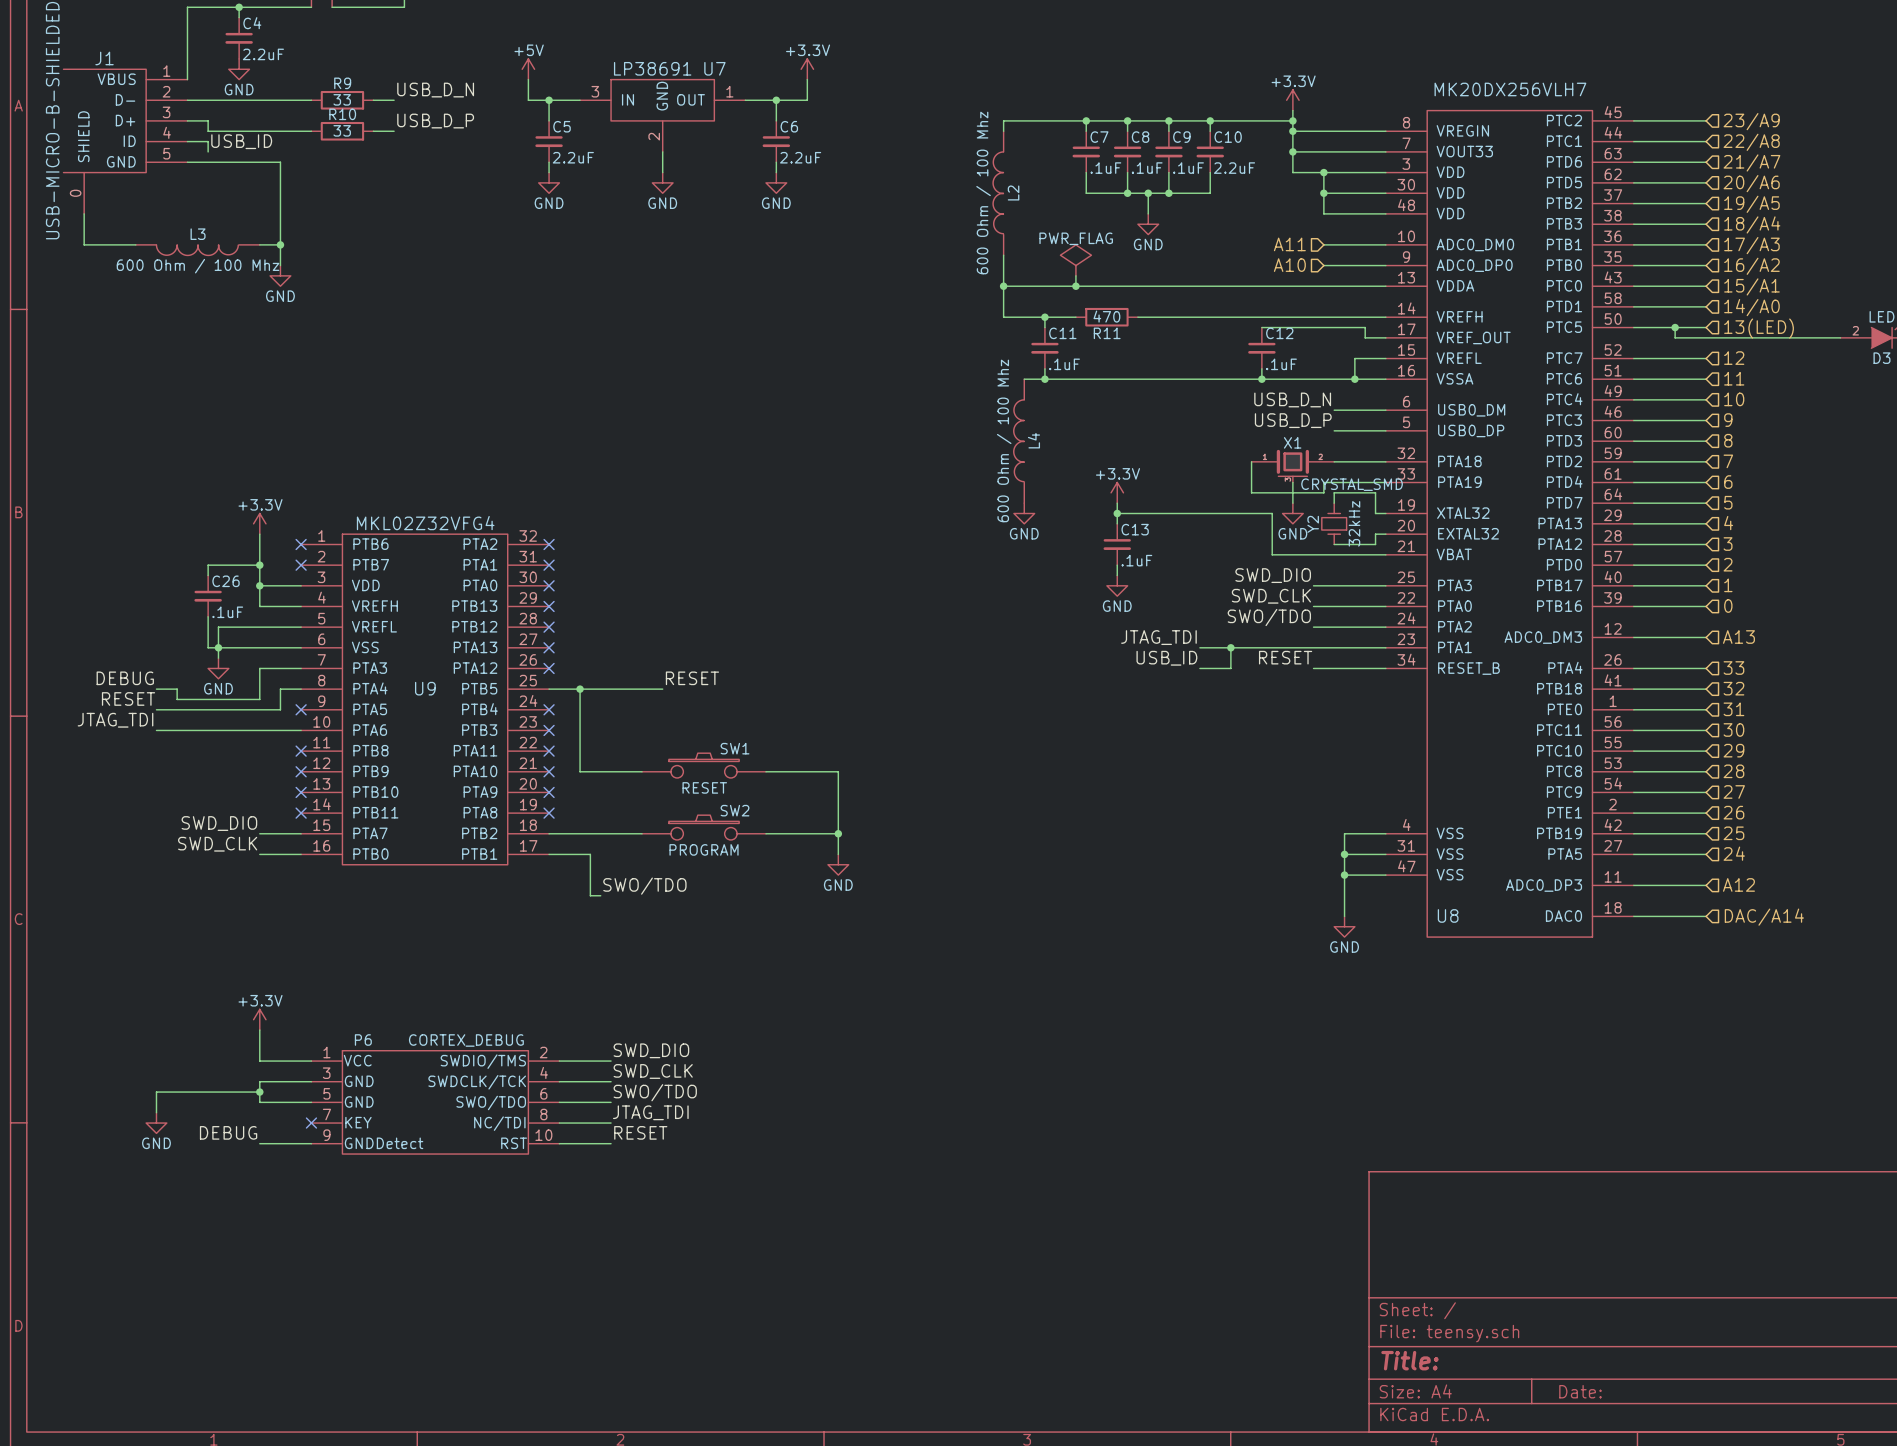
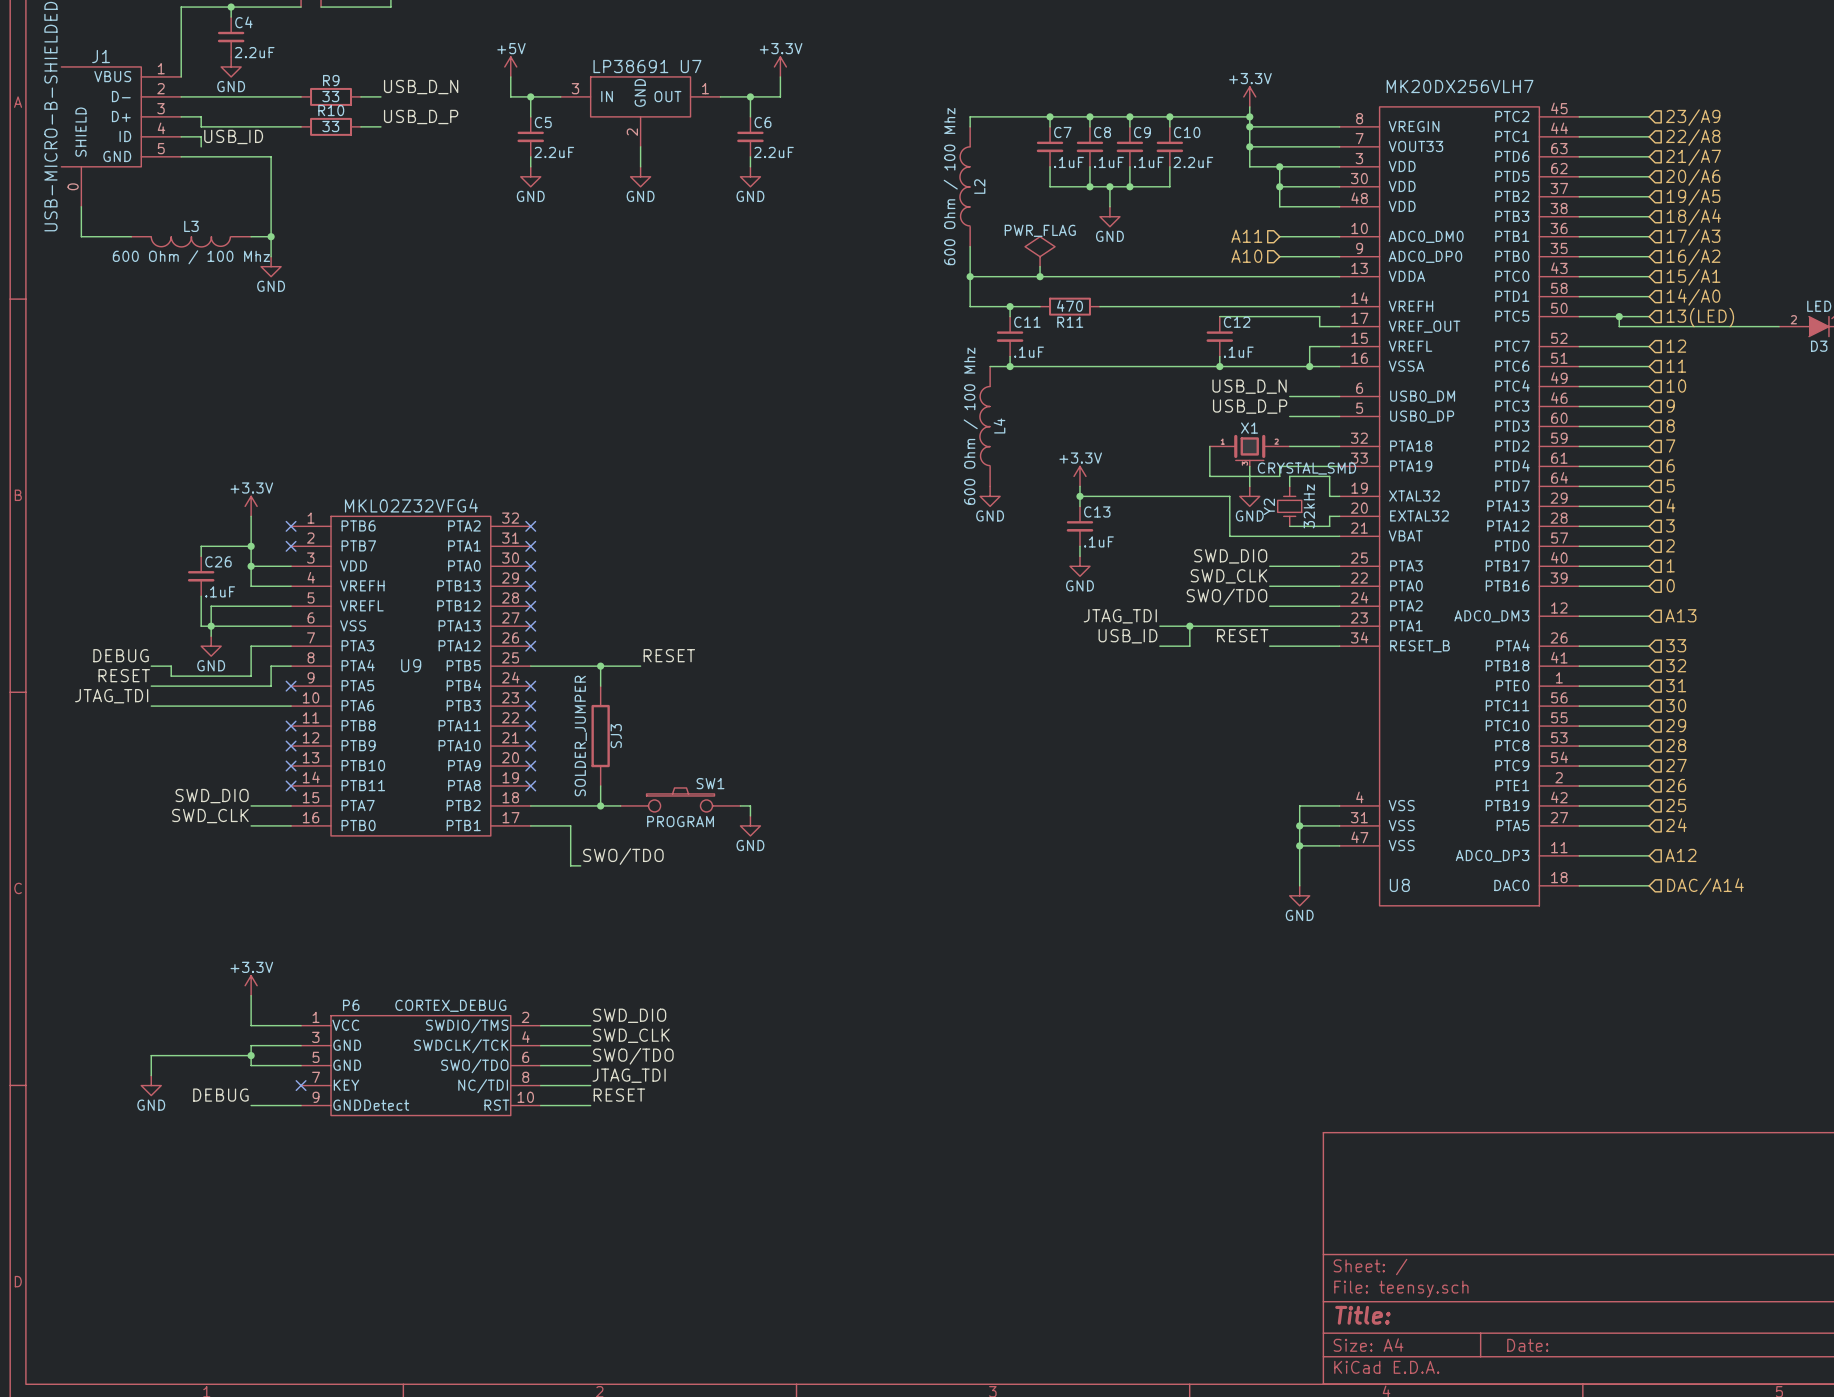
wire: (580, 689) (580, 771) (642, 771) -> none
junction position: (580, 689) -> (600, 666)
wire: none -> (600, 666) (600, 686)
SJ3: none -> SOLDER_JUMPER (600, 736)
SW1: RESET (704, 765) -> none
wire: (766, 771) (838, 771) (838, 854) -> none
SW2 name: SW2 (735, 810) -> SW1 (710, 783)
wire: none -> (600, 785) (600, 805)
junction: none -> (600, 805)
wire: (776, 833) (838, 833) -> (750, 805) (750, 815)
junction: (838, 833) -> none
power symbol position: GND (838, 864) -> GND (750, 825)

